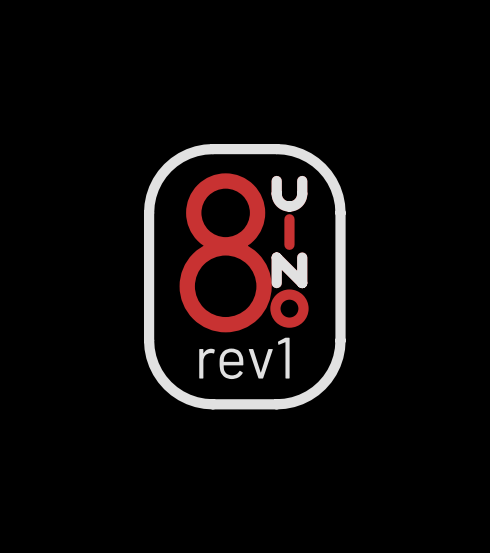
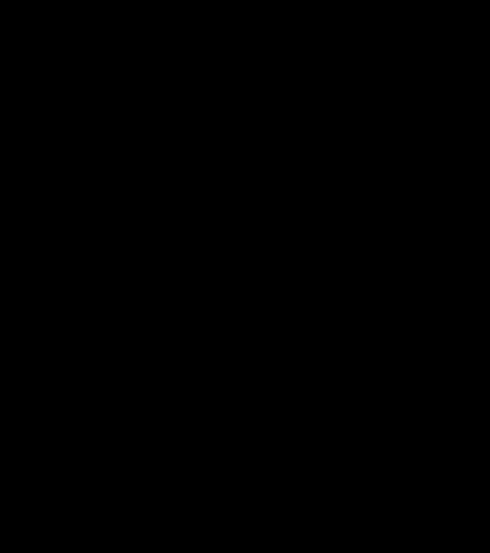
drawing: [143, 143, 346, 410] -> none

